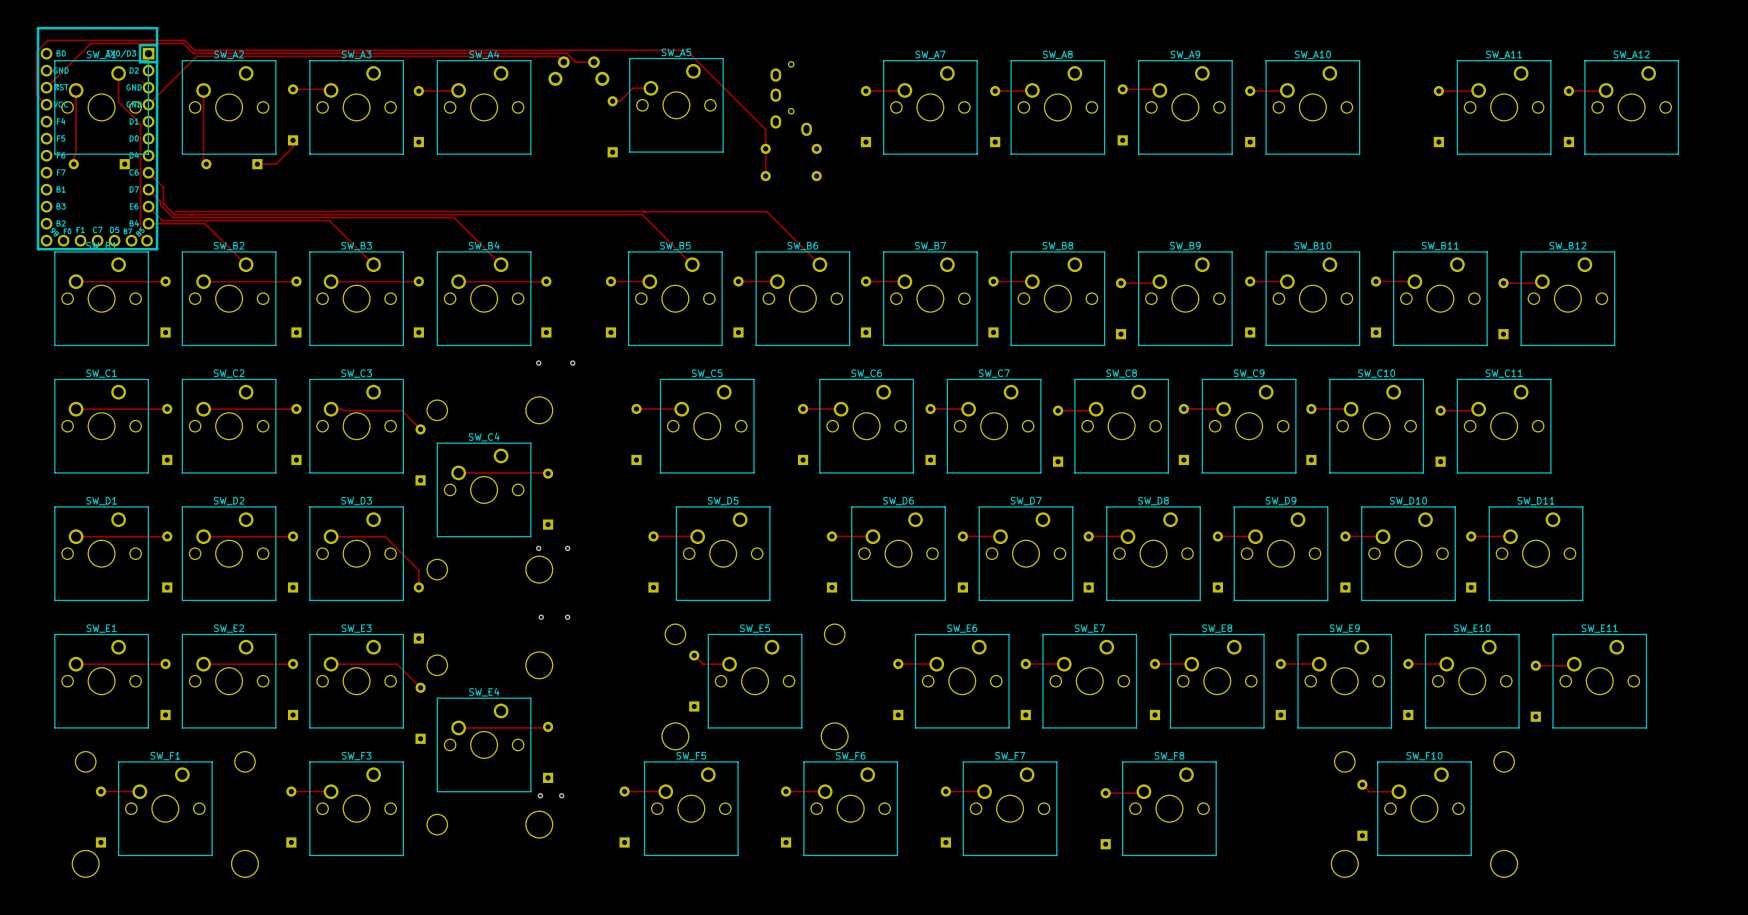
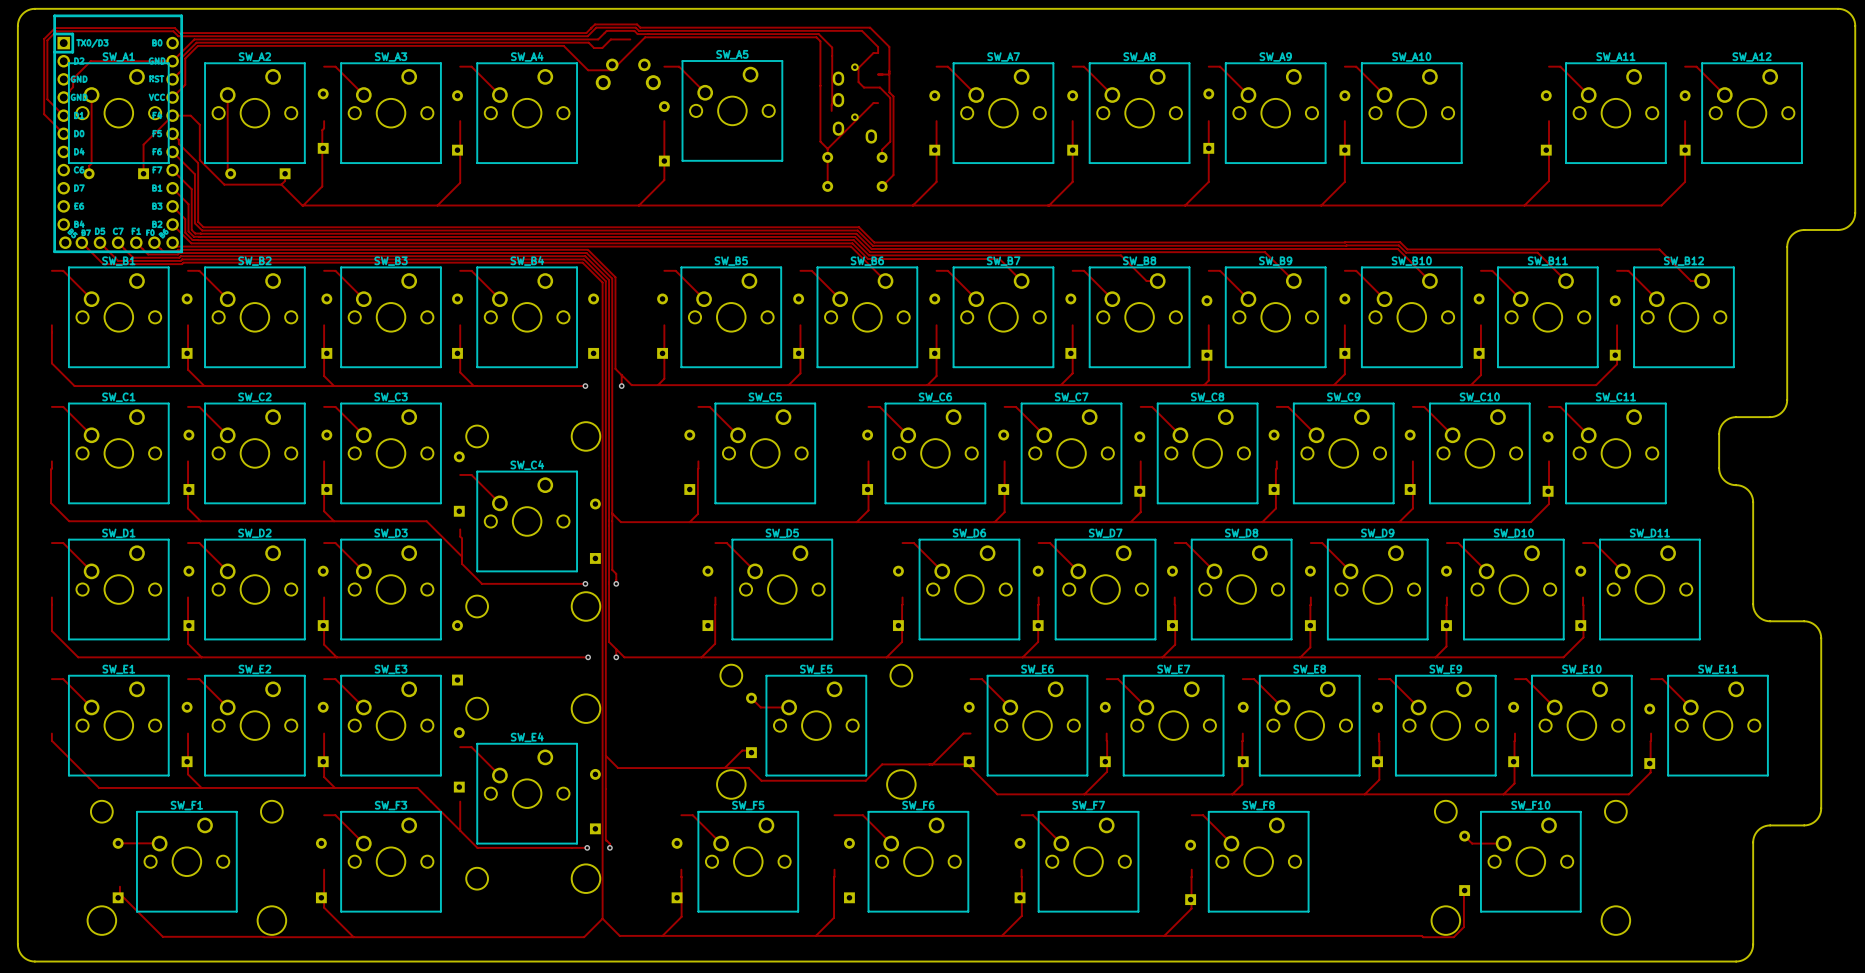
board edge: none -> (34, 8) (1838, 8) (1846, 11) (1852, 17) (1855, 25) (1854, 217) (1850, 225) (1842, 229) (1801, 230) (1795, 232) (1789, 238) (1787, 247) (1785, 406) (1780, 413) (1774, 416) (1729, 418) (1722, 423) (1719, 431) (1719, 468) (1721, 476) (1729, 483) (1746, 488) (1752, 497) (1753, 604) (1755, 612) (1759, 617) (1767, 621) (1810, 622) (1817, 627) (1821, 638) (1820, 812) (1816, 820) (1808, 824) (1767, 825) (1761, 827) (1755, 833) (1753, 842) (1753, 944) (1750, 953) (1744, 959) (1736, 961) (34, 961) (26, 959) (20, 953) (17, 944) (17, 25) (22, 13) (34, 8)
track: none -> (630, 39) (610, 39) (602, 48) (594, 48) (588, 42) (196, 42) (181, 58) (181, 70) (172, 79)
track: (563, 62) (558, 56) (196, 56) (148, 104) (148, 87) (142, 81) -> none
track: (593, 62) (575, 62) (566, 53) (193, 53) (183, 43) (90, 43) (46, 87) -> none
track: none -> (889, 73) (878, 74)
track: (118, 73) (118, 102) (140, 123) (140, 234) (147, 240) -> none
track: none -> (63, 79) (72, 79) (90, 61) (172, 61) (194, 39) (598, 39) (606, 30) (634, 30) (637, 34) (818, 34) (832, 47) (831, 110)
track: none -> (73, 78) (73, 87) (63, 97)
track: (650, 88) (632, 88) (619, 101) (612, 101) -> (705, 92) (679, 66) (664, 66)
track: (293, 89) (330, 89) -> (324, 66) (335, 66) (362, 93)
track: (1122, 89) (1158, 89) -> (1208, 66) (1220, 66) (1247, 93)
track: (458, 90) (418, 91) -> (499, 95) (471, 66) (460, 66)
track: (904, 90) (865, 91) -> (976, 95) (947, 66) (936, 66)
track: (1032, 90) (995, 91) -> (1112, 95) (1084, 66) (1072, 66)
track: (1287, 90) (1250, 91) -> (1384, 95) (1356, 66) (1344, 66)
track: (1478, 90) (1438, 91) -> (1588, 95) (1560, 66) (1549, 66)
track: (1606, 90) (1568, 91) -> (1724, 95) (1696, 66) (1685, 66)
track: none -> (172, 97) (185, 84) (185, 58) (197, 45) (563, 45) (588, 70) (612, 70) (645, 37) (816, 37) (820, 41) (820, 141) (827, 148) (873, 103) (878, 103)
track: (46, 104) (36, 94) (36, 51) (47, 40) (184, 40) (194, 50) (686, 50) (765, 129) (765, 140) -> none
track: none -> (63, 115) (47, 99) (47, 40) (56, 31) (173, 31) (178, 36) (587, 36) (596, 27) (635, 27) (639, 30) (862, 30) (878, 46) (878, 53) (873, 53) (858, 68) (858, 82) (863, 87) (879, 87) (890, 97) (890, 141) (882, 149) (882, 157)
track: none -> (324, 121) (322, 130) (322, 186) (303, 205)
track: none -> (460, 121) (460, 182) (437, 205)
track: none -> (664, 121) (664, 180) (638, 205)
track: none -> (936, 121) (936, 181) (912, 205)
track: none -> (1072, 121) (1072, 181) (1049, 205)
track: none -> (1208, 121) (1208, 181) (1185, 205)
track: none -> (1344, 121) (1344, 181) (1321, 205)
track: none -> (1549, 121) (1549, 181) (1524, 205)
track: none -> (1685, 121) (1685, 181) (1661, 205) (302, 205) (281, 184)
track: none -> (63, 133) (44, 114) (44, 39) (55, 28) (174, 28) (179, 33) (586, 33) (594, 24) (637, 24) (640, 27) (870, 27) (889, 46) (889, 92) (893, 96) (893, 175) (882, 186)
track: none -> (172, 133) (178, 140) (178, 143) (198, 163) (198, 221) (203, 227) (859, 227) (874, 242) (1400, 242) (1407, 249) (1659, 249) (1691, 281) (1702, 281)
part side: bottom (97, 138) -> top (118, 133)
track: (293, 140) (293, 147) (276, 164) (257, 164) -> (281, 184) (285, 180) (285, 173)
track: none -> (172, 151) (194, 174) (194, 223) (202, 230) (857, 230) (872, 245) (1398, 245) (1406, 252) (1537, 252) (1566, 281)
track: none -> (172, 170) (191, 189) (191, 230) (195, 233) (856, 233) (871, 248) (1397, 248) (1429, 281)
track: none -> (143, 173) (143, 144) (172, 115) (190, 115) (199, 124) (199, 160) (224, 184) (281, 184)
track: (148, 172) (163, 187) (163, 203) (174, 214) (642, 214) (692, 264) -> none
track: none -> (172, 188) (188, 204) (188, 231) (193, 236) (855, 236) (870, 252) (1264, 252) (1293, 281)
track: (148, 189) (173, 217) (454, 217) (501, 264) -> none
track: none -> (172, 206) (185, 219) (185, 232) (192, 239) (853, 240) (868, 255) (1120, 255) (1146, 281) (1157, 281)
track: (148, 206) (162, 220) (329, 220) (373, 264) -> none
track: none -> (172, 224) (191, 243) (852, 243) (868, 259) (999, 259) (1021, 281)
track: (175, 211) (766, 211) (787, 232) -> (172, 242) (176, 246) (851, 246)
track: (148, 223) (205, 223) (246, 264) -> none
track: none -> (81, 242) (103, 264) (582, 262) (602, 282) (602, 918)
track: none -> (100, 242) (118, 260) (583, 259) (605, 281) (605, 840) (609, 843) (609, 847)
track: none -> (118, 242) (133, 257) (585, 256) (609, 279) (609, 641) (624, 657) (1563, 657) (1583, 637) (1583, 597)
track: none -> (136, 242) (148, 254) (586, 253) (612, 278) (612, 569) (616, 573) (616, 583)
track: none -> (154, 242) (163, 251) (587, 249) (615, 277) (615, 368) (631, 385) (1596, 385) (1617, 364) (1617, 325)
track: (165, 281) (76, 281) -> (51, 270) (63, 270) (91, 299)
track: (296, 281) (203, 281) -> (188, 270) (199, 270) (227, 299)
track: (418, 281) (331, 281) -> (324, 270) (335, 270) (363, 299)
track: (546, 281) (458, 281) -> (460, 270) (471, 270) (499, 299)
track: (610, 281) (649, 281) -> (664, 270) (675, 270) (703, 298)
track: (738, 281) (777, 281) -> (800, 270) (811, 270) (839, 298)
track: (865, 281) (904, 281) -> (936, 270) (947, 270) (976, 298)
track: (993, 281) (1032, 281) -> (1072, 270) (1084, 270) (1112, 298)
track: (1159, 281) (1120, 283) -> (1248, 299) (1220, 270) (1208, 270)
track: (1250, 281) (1287, 281) -> (1344, 270) (1356, 270) (1384, 298)
track: (1376, 281) (1414, 281) -> (1480, 270) (1492, 270) (1520, 298)
track: (1542, 281) (1503, 283) -> (1656, 299) (1628, 270) (1617, 270)
track: none -> (51, 325) (51, 363) (74, 386) (585, 386)
track: none -> (188, 325) (188, 369) (204, 386)
track: none -> (324, 325) (324, 376) (334, 386)
track: none -> (460, 325) (460, 372) (473, 386)
track: none -> (664, 325) (664, 378) (658, 385)
track: none -> (800, 325) (800, 373) (788, 385)
track: none -> (936, 325) (936, 376) (927, 385)
track: none -> (1072, 325) (1072, 373) (1060, 385)
track: none -> (1208, 325) (1208, 380) (1204, 385)
track: none -> (1344, 325) (1344, 374) (1333, 385)
track: none -> (1480, 325) (1480, 375) (1470, 385)
track: none -> (621, 375) (621, 386)
track: (167, 408) (76, 409) -> (51, 406) (63, 406) (91, 435)
track: (296, 408) (203, 409) -> (188, 406) (199, 406) (227, 435)
track: (636, 408) (681, 408) -> (698, 406) (709, 406) (737, 435)
track: (803, 408) (840, 408) -> (868, 406) (879, 406) (907, 435)
track: (930, 408) (968, 408) -> (1004, 406) (1015, 406) (1044, 435)
track: (1183, 408) (1223, 408) -> (1276, 406) (1288, 406) (1316, 435)
track: (1311, 408) (1350, 408) -> (1412, 406) (1424, 406) (1452, 435)
track: (331, 409) (401, 410) (420, 429) -> (363, 435) (335, 406) (324, 406)
track: (1096, 409) (1058, 410) -> (1180, 435) (1152, 406) (1140, 406)
track: (1478, 409) (1440, 410) -> (1588, 435) (1560, 406) (1549, 406)
track: none -> (51, 461) (51, 503) (69, 521) (426, 521) (462, 556)
track: none -> (188, 461) (188, 508) (200, 521)
track: none -> (324, 461) (324, 511) (334, 521)
track: none -> (698, 461) (697, 513) (689, 522)
track: none -> (868, 461) (868, 510) (856, 522)
track: none -> (1004, 461) (1004, 512) (994, 522)
track: none -> (1140, 461) (1140, 512) (1130, 522)
track: none -> (1276, 461) (1275, 508) (1262, 522)
track: none -> (1412, 461) (1412, 508) (1399, 522)
track: none -> (1549, 461) (1549, 504) (1530, 522) (620, 522) (612, 513)
track: (458, 472) (548, 473) -> (499, 503) (471, 474) (460, 474)
track: none -> (460, 529) (462, 563) (481, 583) (585, 583)
track: (167, 536) (76, 536) -> (51, 543) (63, 543) (91, 571)
track: (293, 536) (203, 536) -> (188, 543) (199, 543) (227, 571)
track: (331, 536) (385, 536) (418, 570) (418, 587) -> (363, 571) (335, 543) (324, 543)
track: (653, 536) (697, 536) -> (715, 543) (726, 543) (754, 571)
track: (831, 536) (872, 536) -> (902, 543) (913, 543) (942, 571)
track: (962, 536) (1000, 536) -> (1038, 543) (1049, 543) (1078, 571)
track: (1088, 536) (1127, 536) -> (1174, 543) (1186, 543) (1214, 571)
track: (1217, 536) (1255, 536) -> (1310, 543) (1322, 543) (1350, 571)
track: (1345, 536) (1382, 536) -> (1446, 543) (1458, 543) (1486, 571)
track: (1471, 536) (1510, 536) -> (1583, 543) (1594, 543) (1622, 571)
track: none -> (51, 597) (51, 631) (78, 657) (588, 657)
track: none -> (188, 597) (188, 643) (201, 657)
track: none -> (324, 597) (324, 644) (336, 657)
track: none -> (715, 597) (715, 643) (701, 657)
track: none -> (902, 597) (902, 641) (886, 657)
track: none -> (1038, 597) (1038, 641) (1022, 657)
track: none -> (1174, 597) (1175, 644) (1162, 657)
track: none -> (1310, 597) (1310, 647) (1300, 657)
track: none -> (1446, 597) (1446, 646) (1435, 657)
track: none -> (616, 649) (616, 657)
track: (165, 663) (76, 664) -> (51, 679) (63, 679) (91, 707)
track: (293, 663) (203, 664) -> (188, 679) (199, 679) (227, 707)
track: (898, 663) (936, 663) -> (970, 679) (981, 679) (1010, 707)
track: (1025, 663) (1064, 663) -> (1106, 679) (1118, 679) (1146, 707)
track: (1154, 663) (1191, 663) -> (1242, 679) (1254, 679) (1282, 707)
track: (1280, 663) (1319, 663) -> (1378, 679) (1390, 679) (1418, 707)
track: (1408, 663) (1446, 663) -> (1514, 679) (1526, 679) (1554, 707)
track: (331, 664) (396, 664) (420, 687) -> (363, 707) (335, 679) (324, 679)
track: (1574, 664) (1535, 665) -> (1690, 707) (1662, 679) (1651, 679)
track: none -> (51, 733) (51, 740) (99, 787) (417, 787) (477, 847) (587, 847)
track: none -> (188, 733) (188, 774) (201, 787)
track: none -> (324, 733) (324, 777) (335, 787)
track: none -> (970, 733) (963, 733) (932, 764)
track: none -> (1106, 733) (1107, 771) (1084, 794)
track: none -> (1242, 733) (1242, 784) (1232, 794)
track: none -> (1378, 733) (1379, 779) (1364, 794)
track: none -> (1514, 733) (1514, 783) (1503, 794)
track: none -> (1651, 733) (1650, 772) (1628, 794) (997, 794) (967, 764) (882, 764) (865, 780) (761, 780) (748, 767) (721, 768)
track: none -> (749, 750) (742, 750) (724, 768) (618, 768) (605, 755)
track: (548, 726) (458, 727) -> (460, 747) (471, 747) (499, 775)
track: none -> (460, 801) (460, 830)
track: (291, 791) (330, 791) -> (324, 815) (335, 815) (363, 843)
track: (624, 791) (665, 791) -> (681, 815) (692, 815) (720, 843)
track: (786, 791) (824, 791) -> (834, 815) (862, 815) (890, 843)
track: (945, 791) (984, 791) -> (1021, 815) (1032, 815) (1061, 843)
track: (1143, 791) (1105, 793) -> (1231, 843) (1203, 815) (1191, 815)
track: none -> (324, 869) (324, 907) (353, 937)
track: none -> (681, 869) (681, 916) (662, 935)
track: none -> (834, 869) (834, 917) (815, 935)
track: none -> (1021, 869) (1021, 915) (1001, 935)
track: none -> (1191, 869) (1191, 908) (1164, 935)
track: none -> (119, 886) (119, 893) (162, 936) (584, 937) (602, 918)
track: none -> (1463, 886) (1463, 927) (1453, 937) (619, 935) (602, 918)

